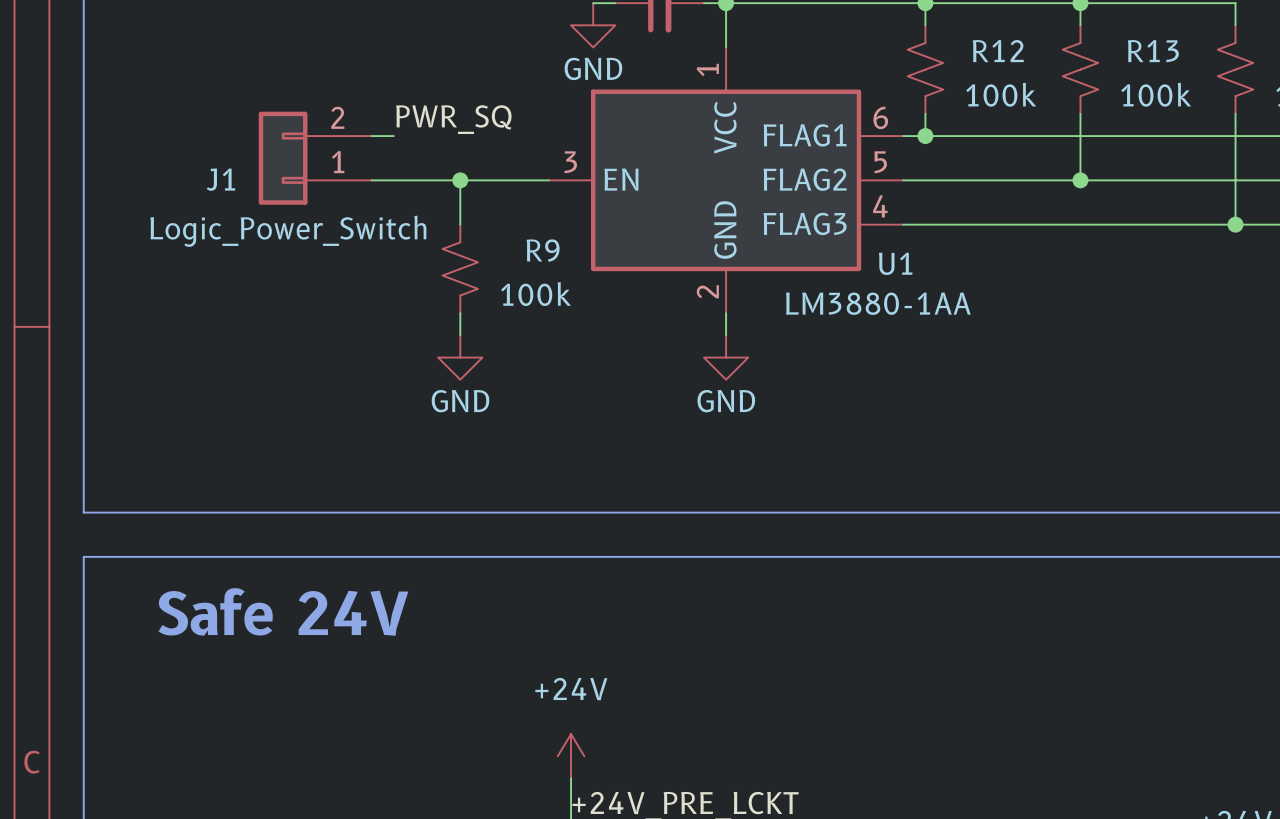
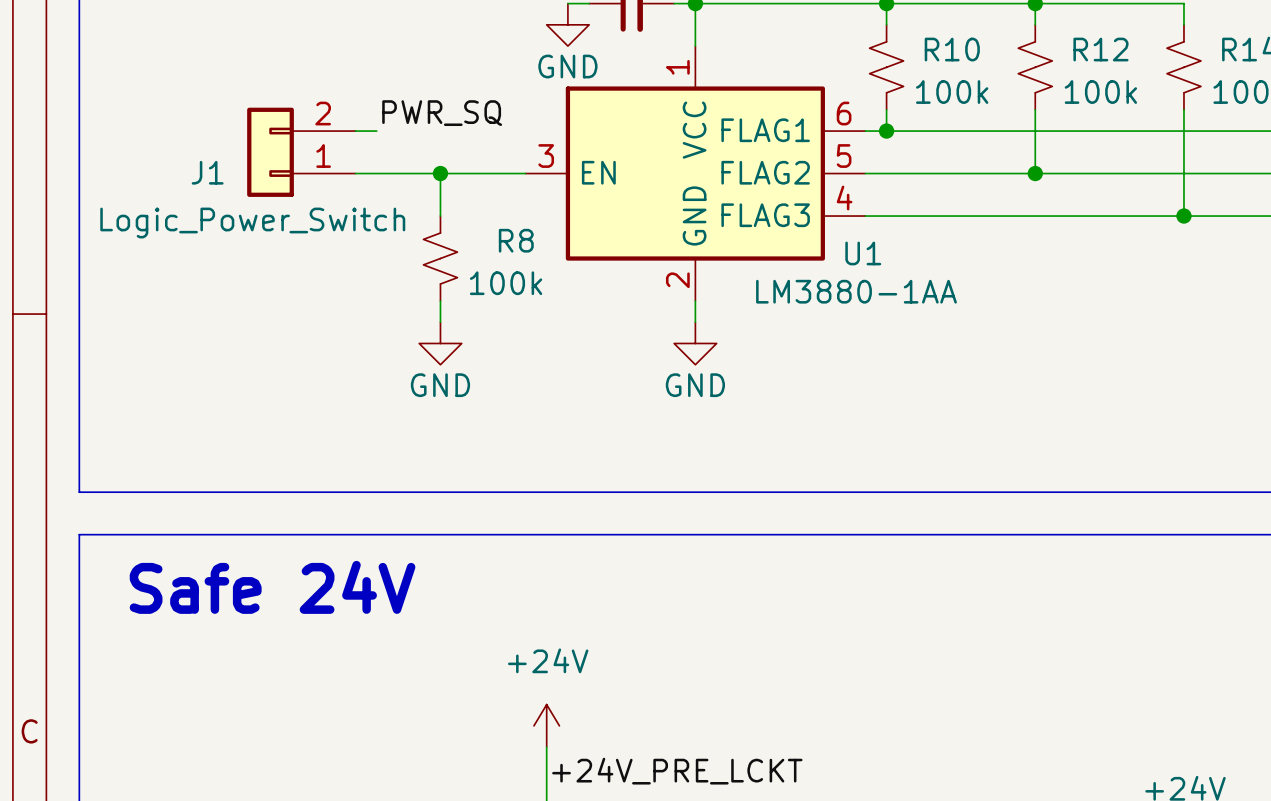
R12 name: R12 (998, 51) -> R10 (952, 49)
R13 name: R13 (1153, 51) -> R12 (1100, 49)
R9 name: R9 (543, 250) -> R8 (516, 240)

